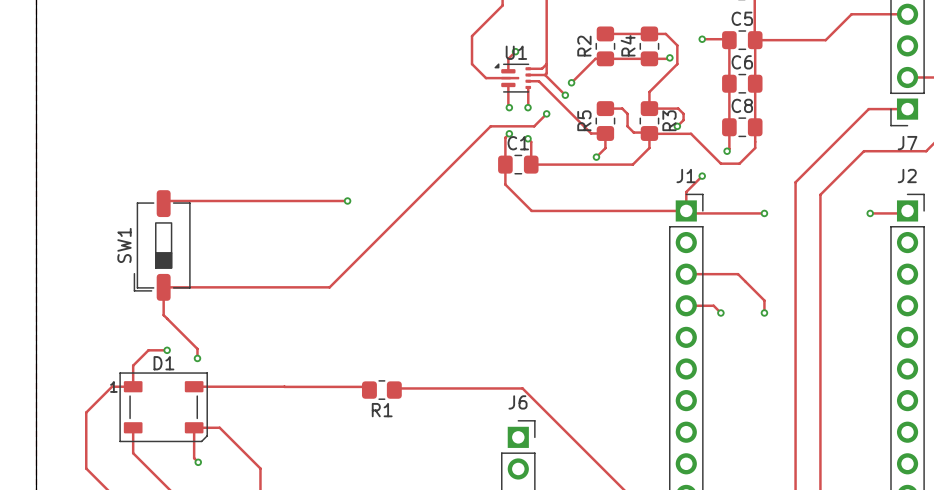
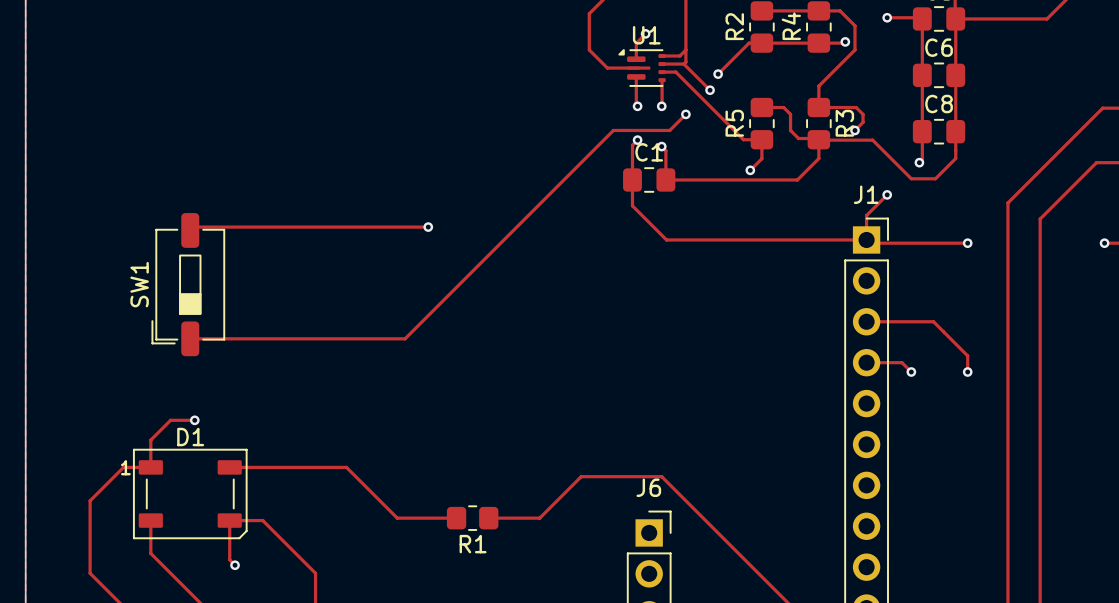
track: (163, 287) (163, 315) (197, 348) (197, 358) -> none
via: (197, 358) -> none
track: (284, 386) (366, 386) (369, 390) -> (346, 467) (397, 518) (456, 518)
R1 position: (381, 390) -> (472, 518)
track: (394, 390) (395, 388) (522, 388) (528, 393) -> (488, 518) (539, 518) (581, 476) (661, 476)

